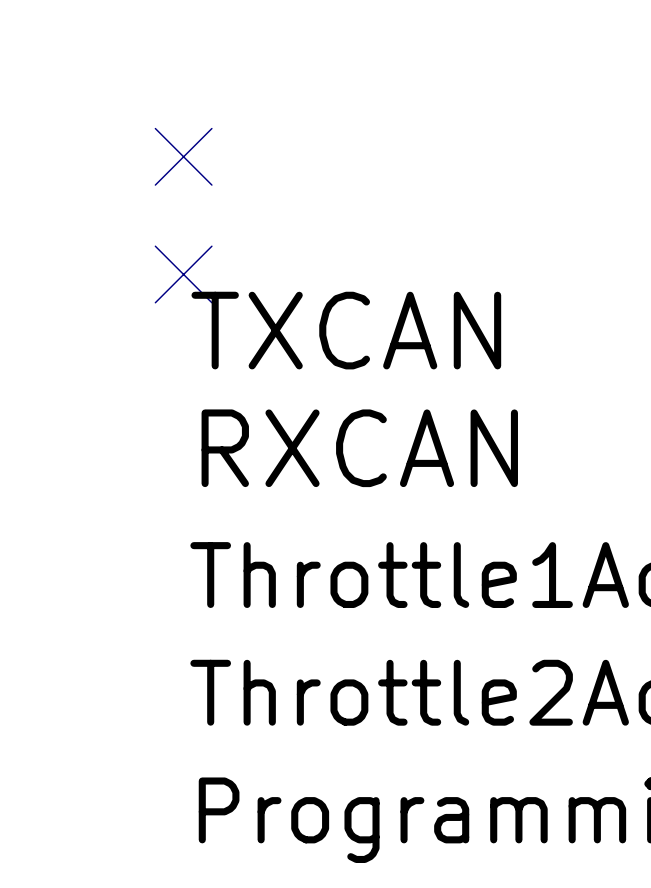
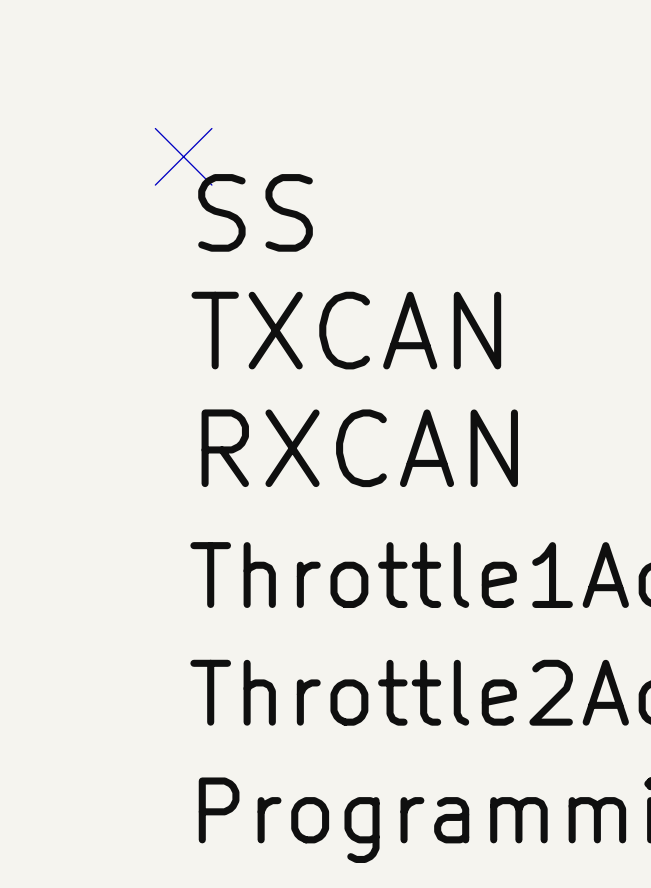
label: none -> SS (255, 212)
no-connect mark: (183, 274) -> none

